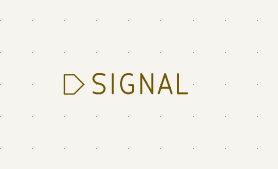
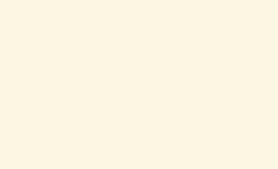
hierarchical label: SIGNAL (140, 83) -> none

